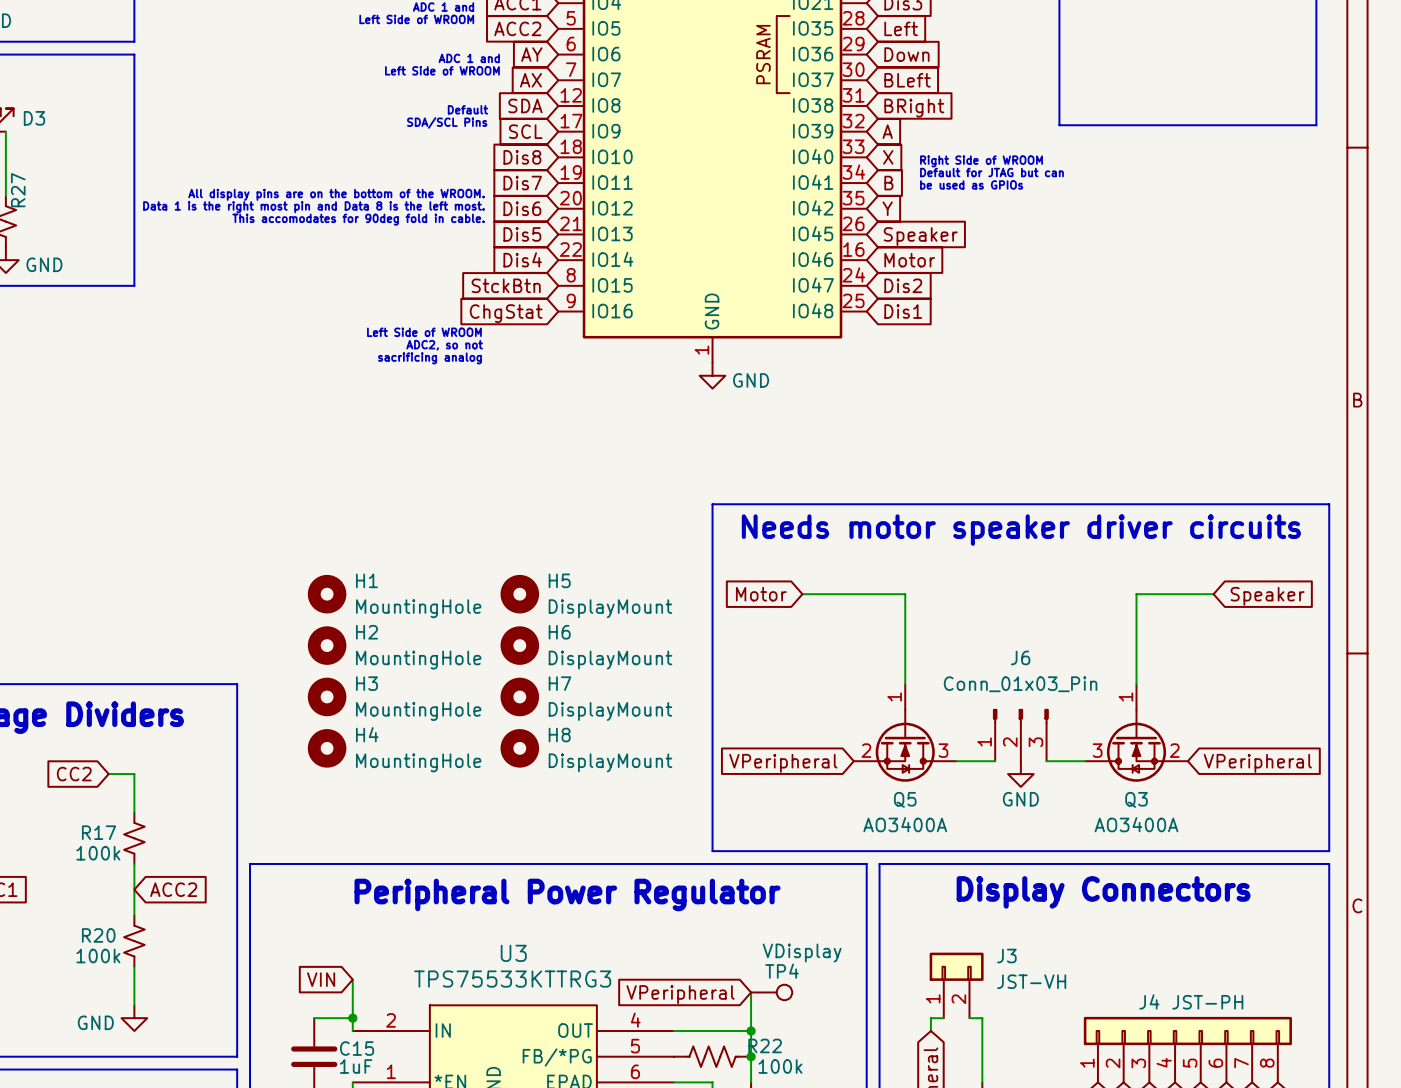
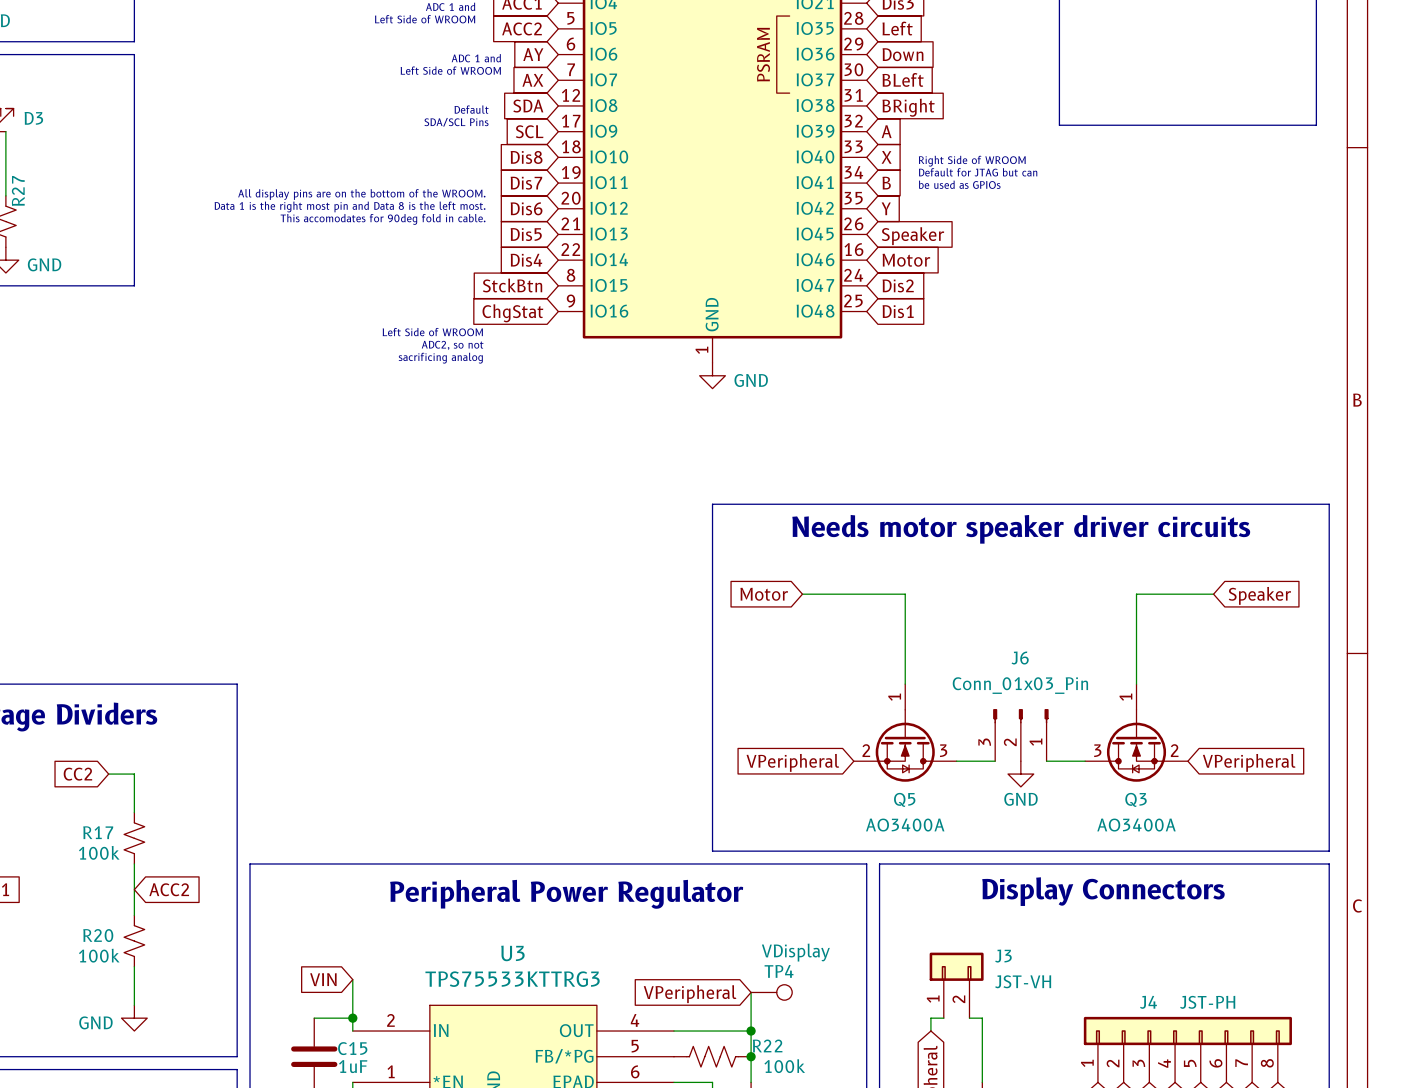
H1: MountingHole (327, 594) -> none
H5: DisplayMount (519, 594) -> none
H2: MountingHole (327, 645) -> none
H6: DisplayMount (519, 645) -> none
H3: MountingHole (327, 696) -> none
H7: DisplayMount (519, 696) -> none
J6 flip: as is (1020, 716) -> left-right (1020, 716)
H4: MountingHole (327, 748) -> none
H8: DisplayMount (519, 748) -> none

